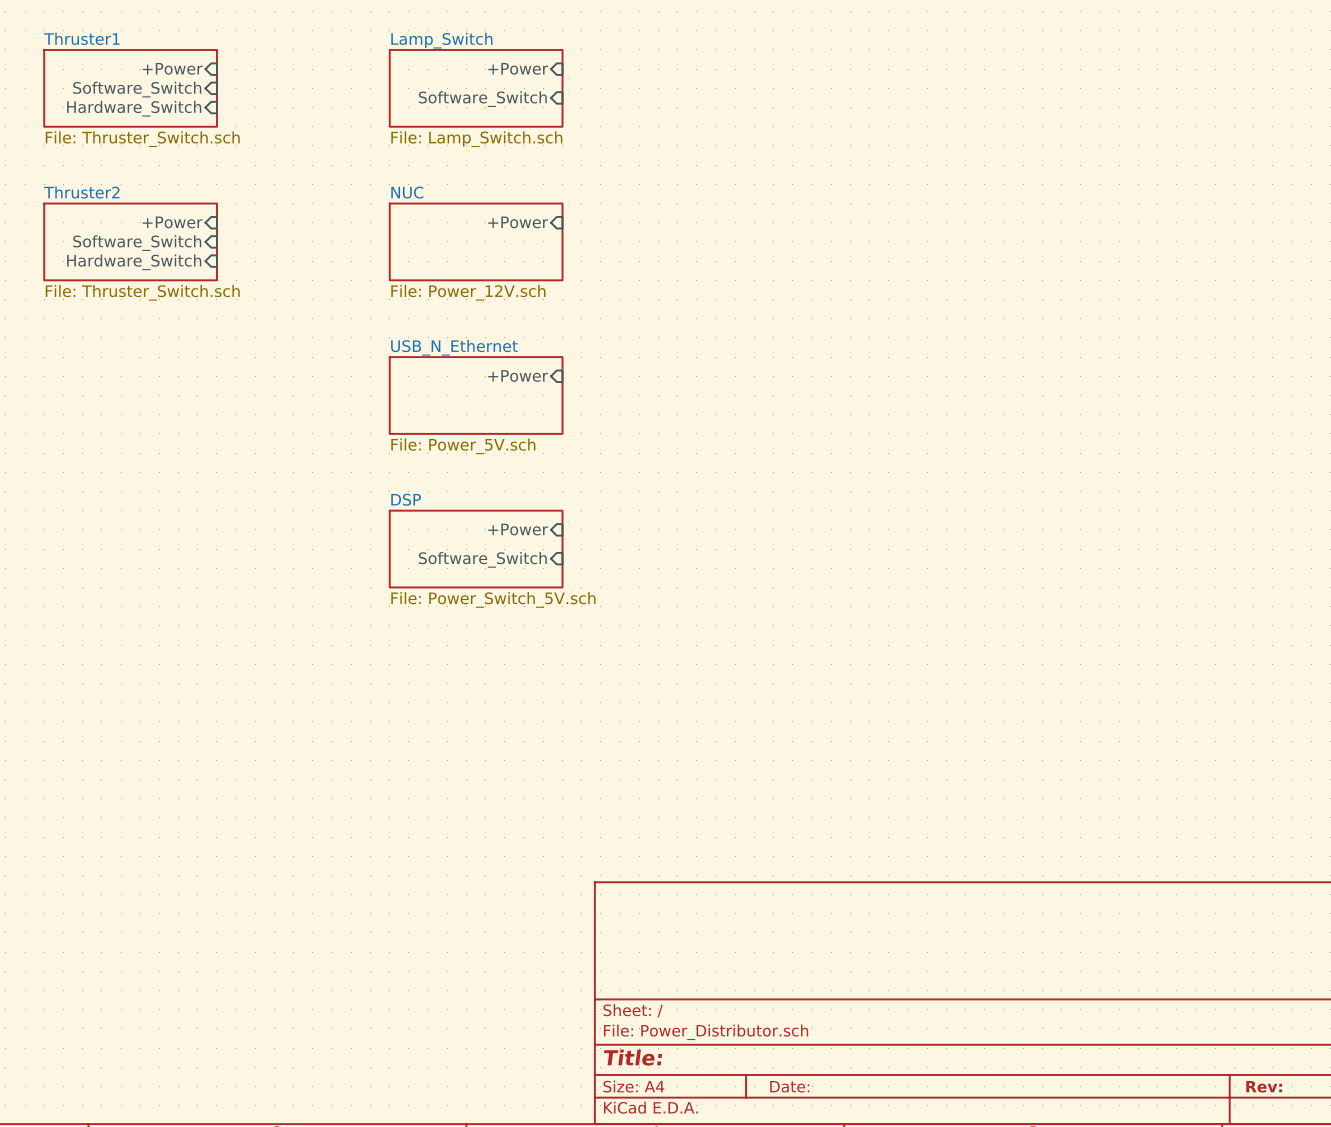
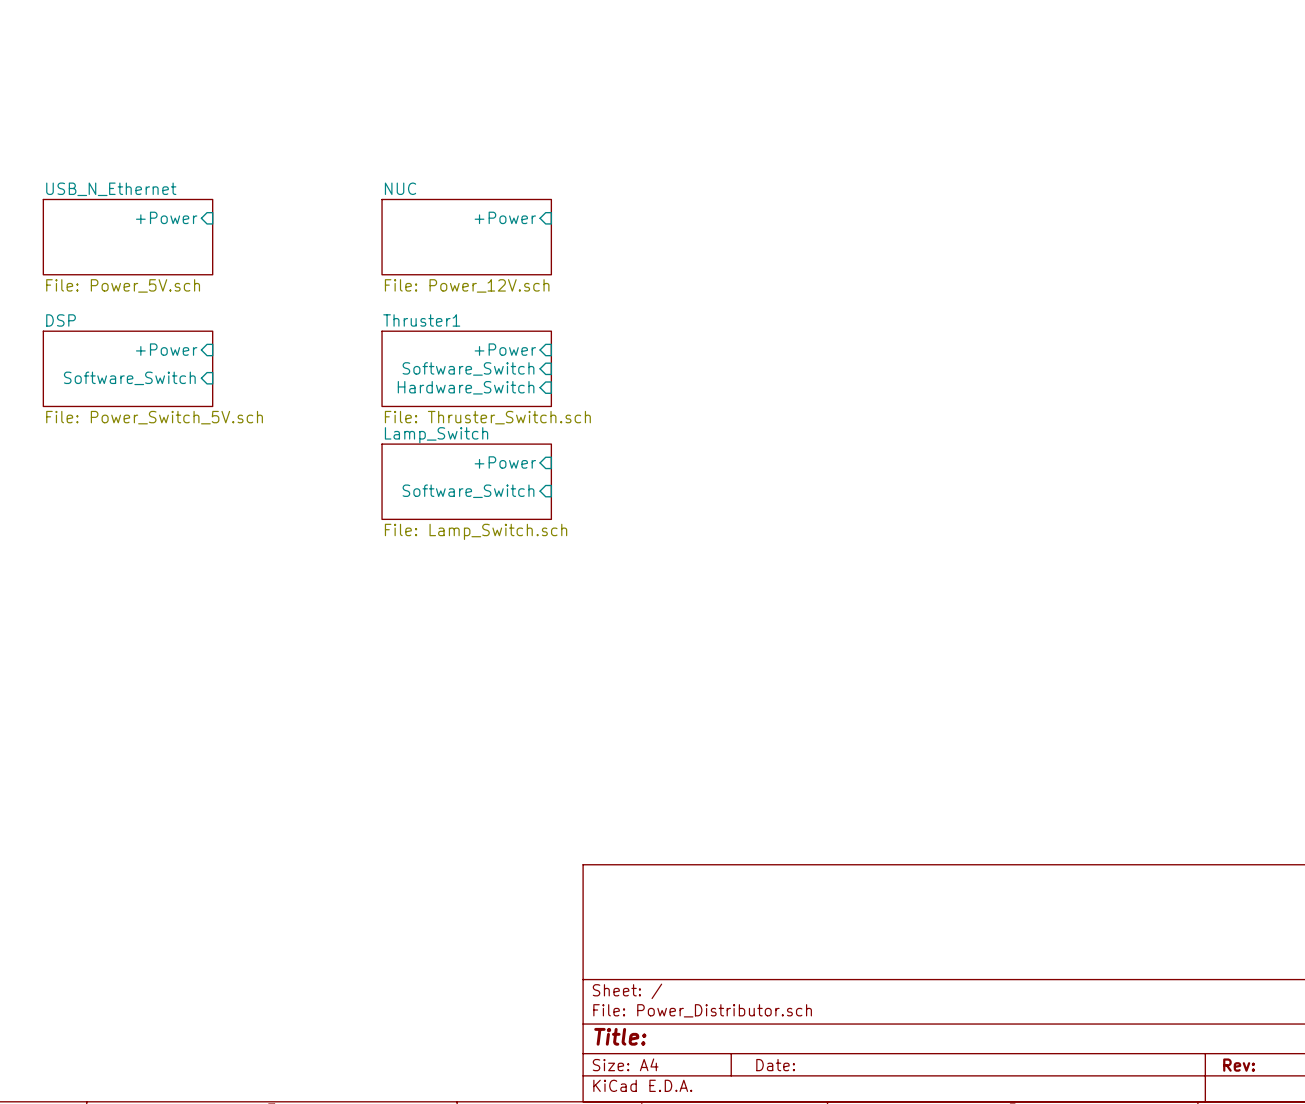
sheet pin: +Power (172, 68) -> none
sheet pin: +Power (518, 68) -> none
sheet Thruster1 position: (130, 88) -> (466, 368)
sheet Lamp_Switch: File: Lamp_Switch.sch (476, 88) -> none
sheet pin: Software_Switch (137, 89) -> none
sheet pin: Software_Switch (482, 99) -> none
sheet pin: Hardware_Switch (134, 108) -> none
sheet Thruster2 name: Thruster2 (81, 192) -> USB_N_Ethernet (111, 189)
sheet pin position: Software_Switch (137, 243) -> Software_Switch (129, 378)
sheet pin: Hardware_Switch (134, 262) -> none
sheet Thruster2 value: File: Thruster_Switch.sch (142, 292) -> File: Power_5V.sch (123, 285)
sheet pin: none -> +Power (166, 349)
sheet pin: none -> +Power (505, 349)
sheet pin: +Power (518, 375) -> Software_Switch (468, 368)
sheet DSP: none -> File: Power_Switch_5V.sch (128, 368)
sheet USB_N_Ethernet: File: Power_5V.sch (476, 395) -> none
sheet pin: none -> Hardware_Switch (466, 387)
sheet Lamp_Switch: none -> File: Lamp_Switch.sch (466, 481)
sheet pin position: +Power (518, 529) -> +Power (505, 462)
sheet DSP: File: Power_Switch_5V.sch (476, 549) -> none
sheet pin position: Software_Switch (482, 559) -> Software_Switch (468, 491)

